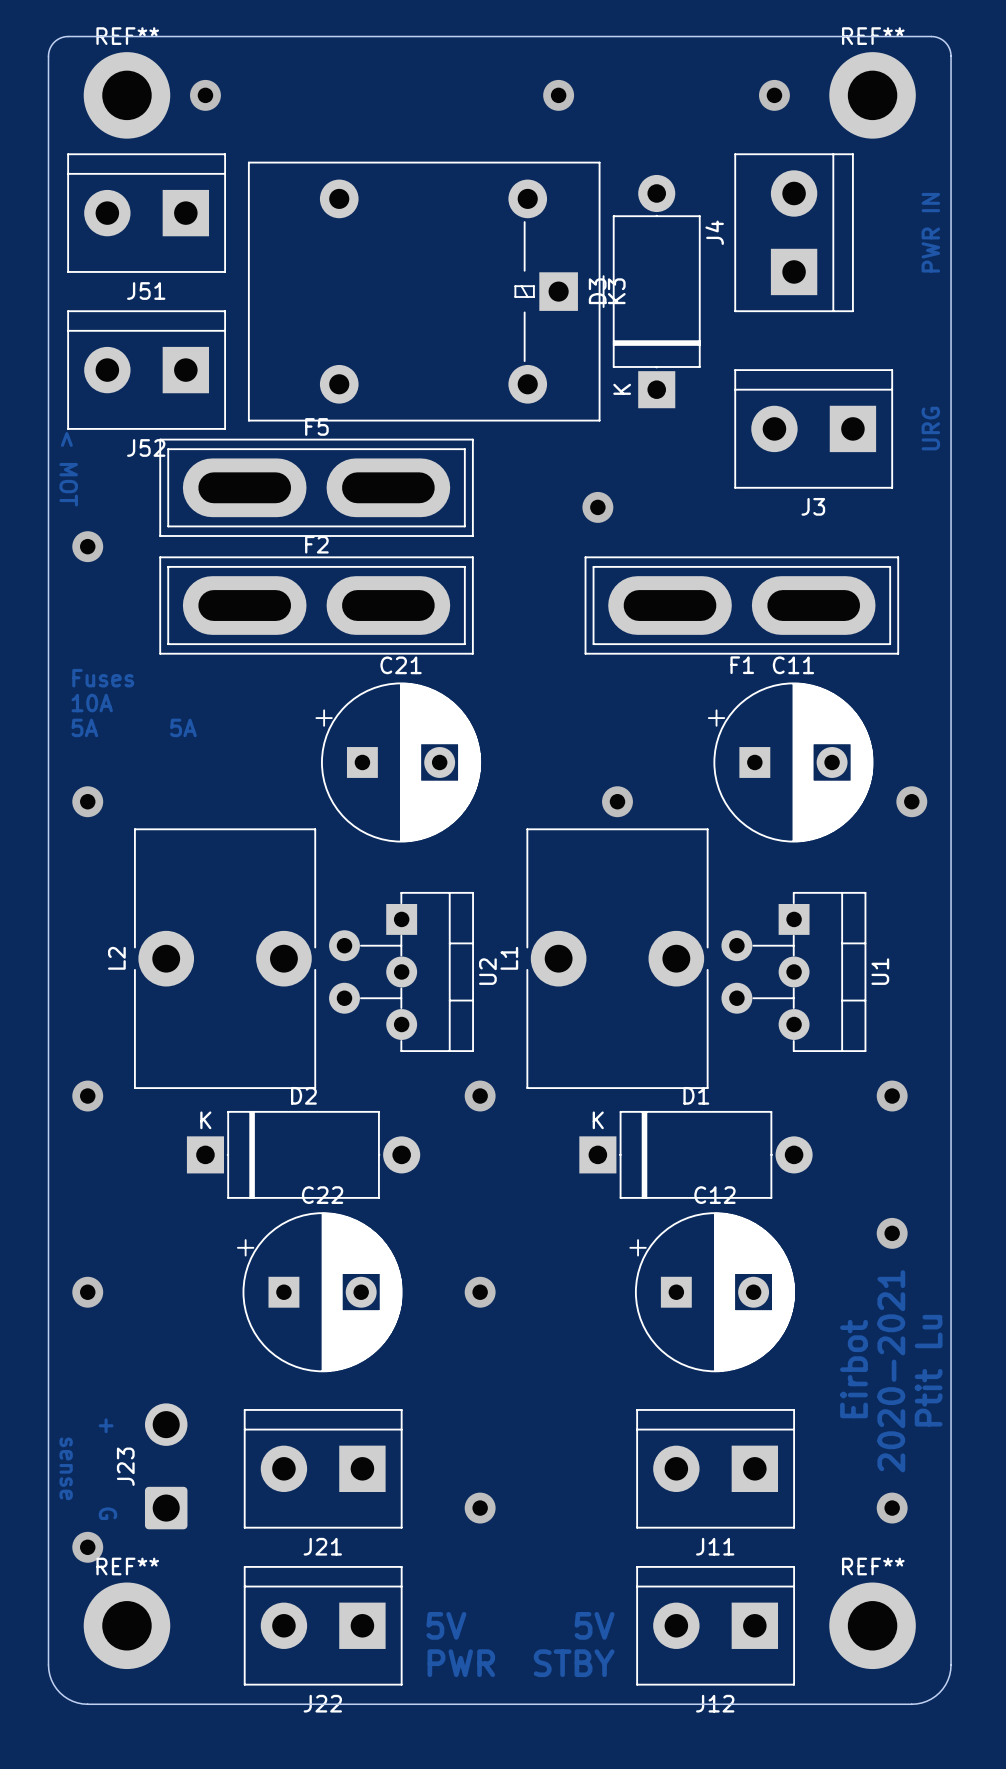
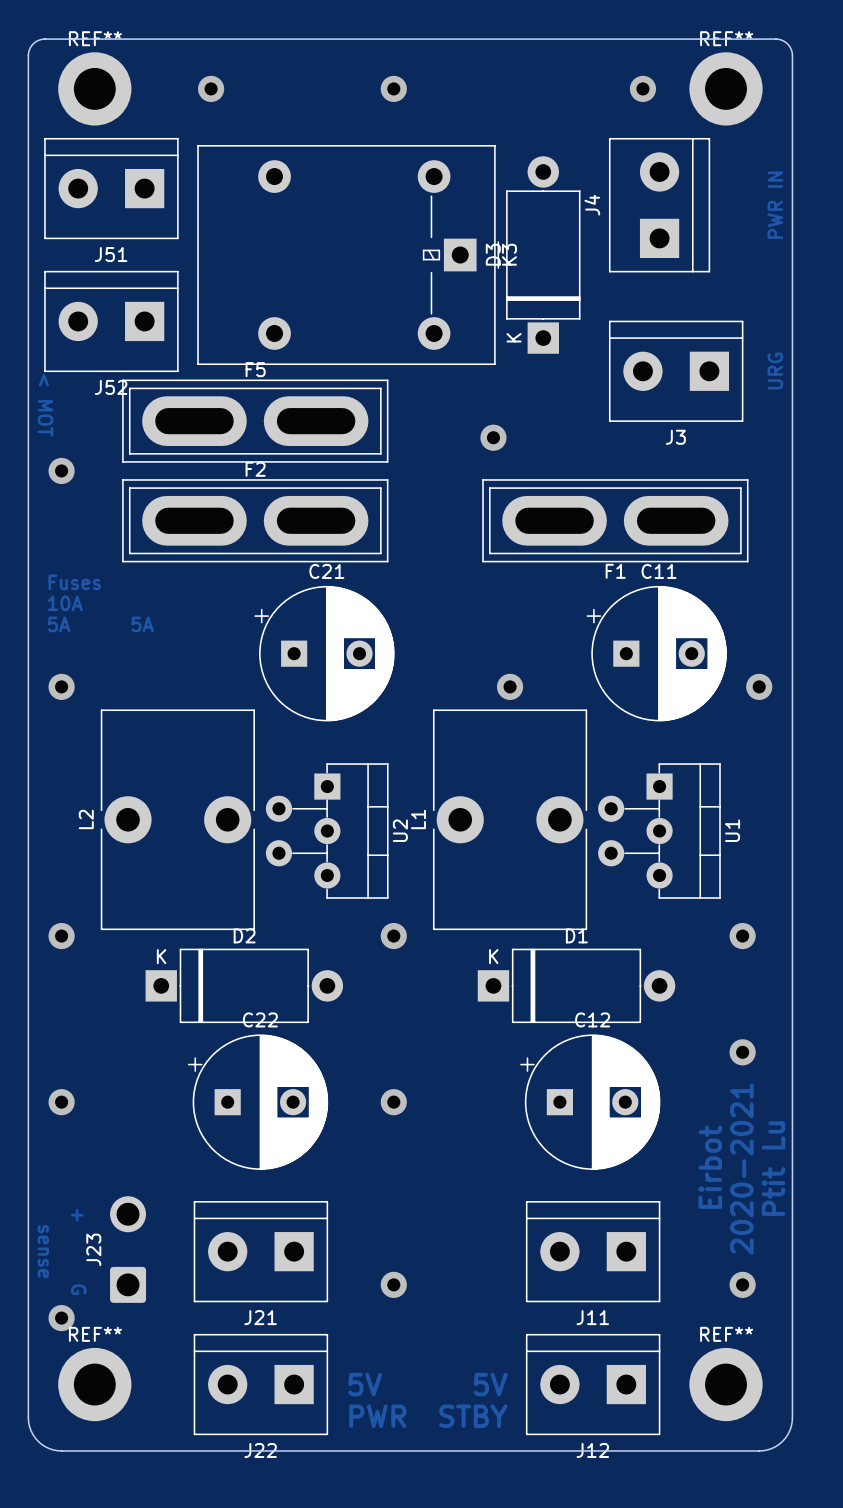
via position: (205, 95) -> (211, 88)
via position: (558, 95) -> (393, 88)

